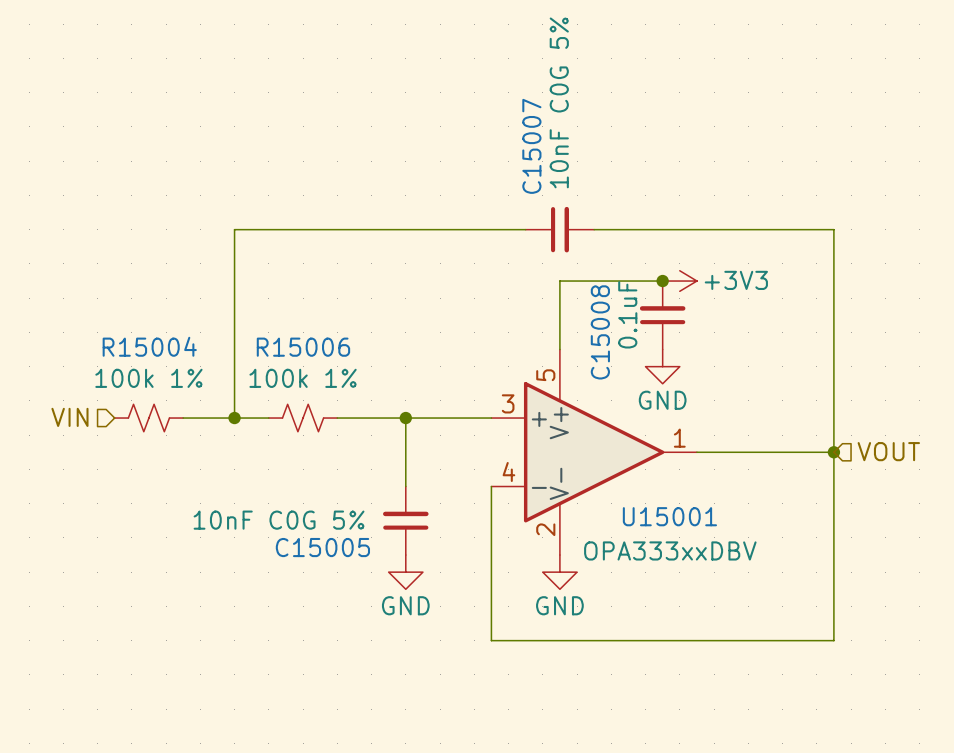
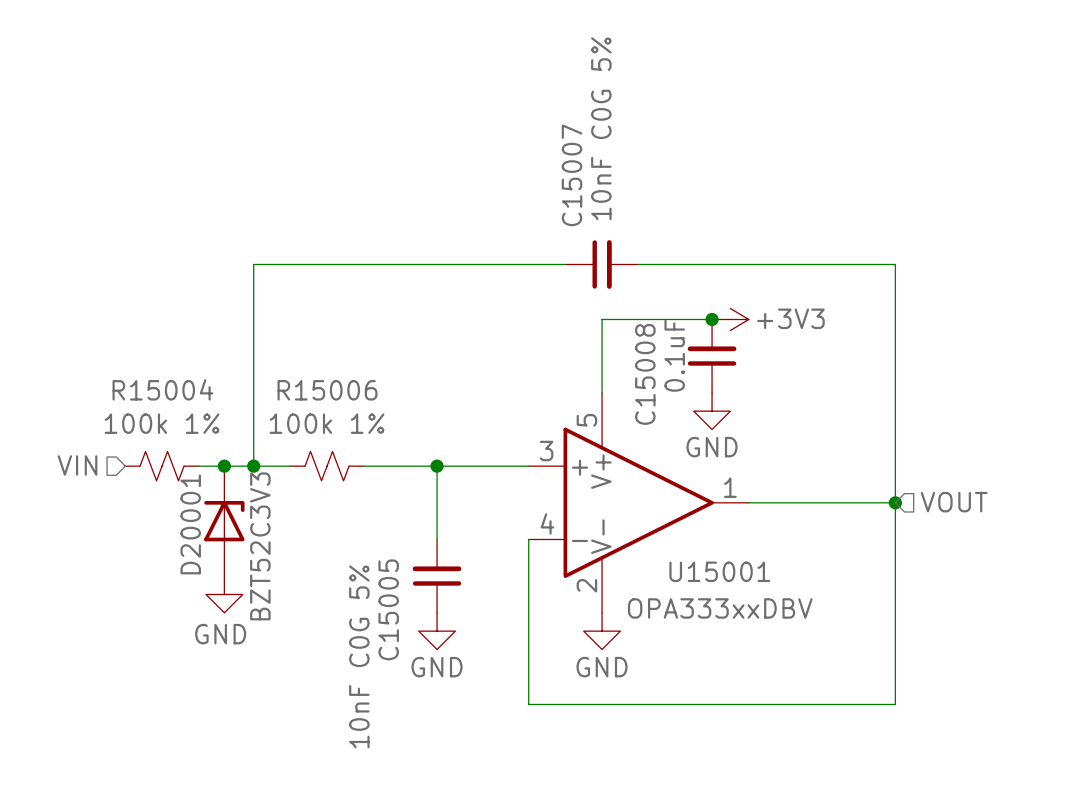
junction: none -> (224, 466)
D20001: none -> BZT52C3V3 (224, 521)
C15005 value rotation: 0° (279, 520) -> 90° counterclockwise (359, 656)
power symbol: none -> GND (224, 594)
C15005 name rotation: 0° (322, 547) -> 90° counterclockwise (388, 609)

